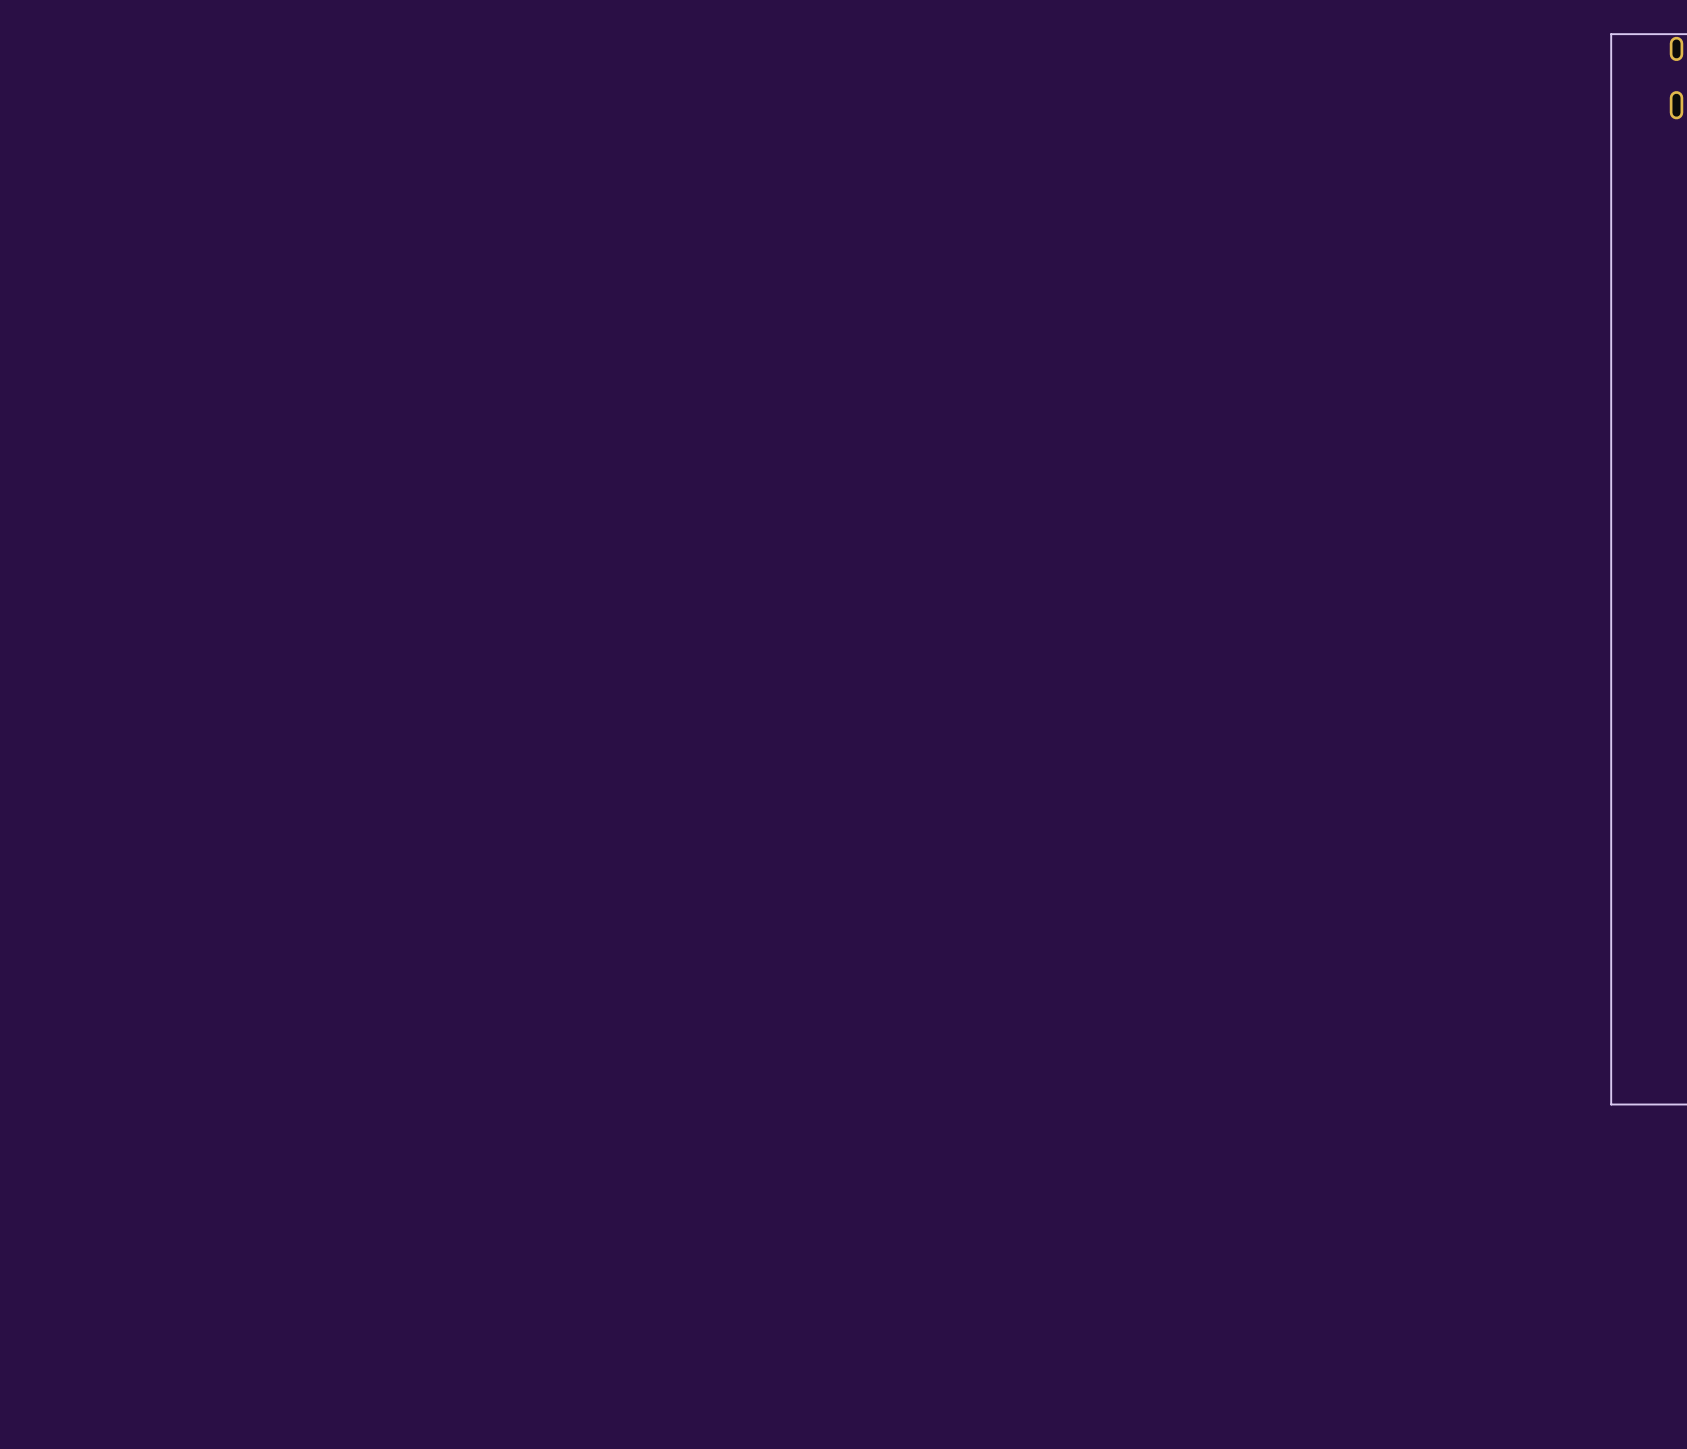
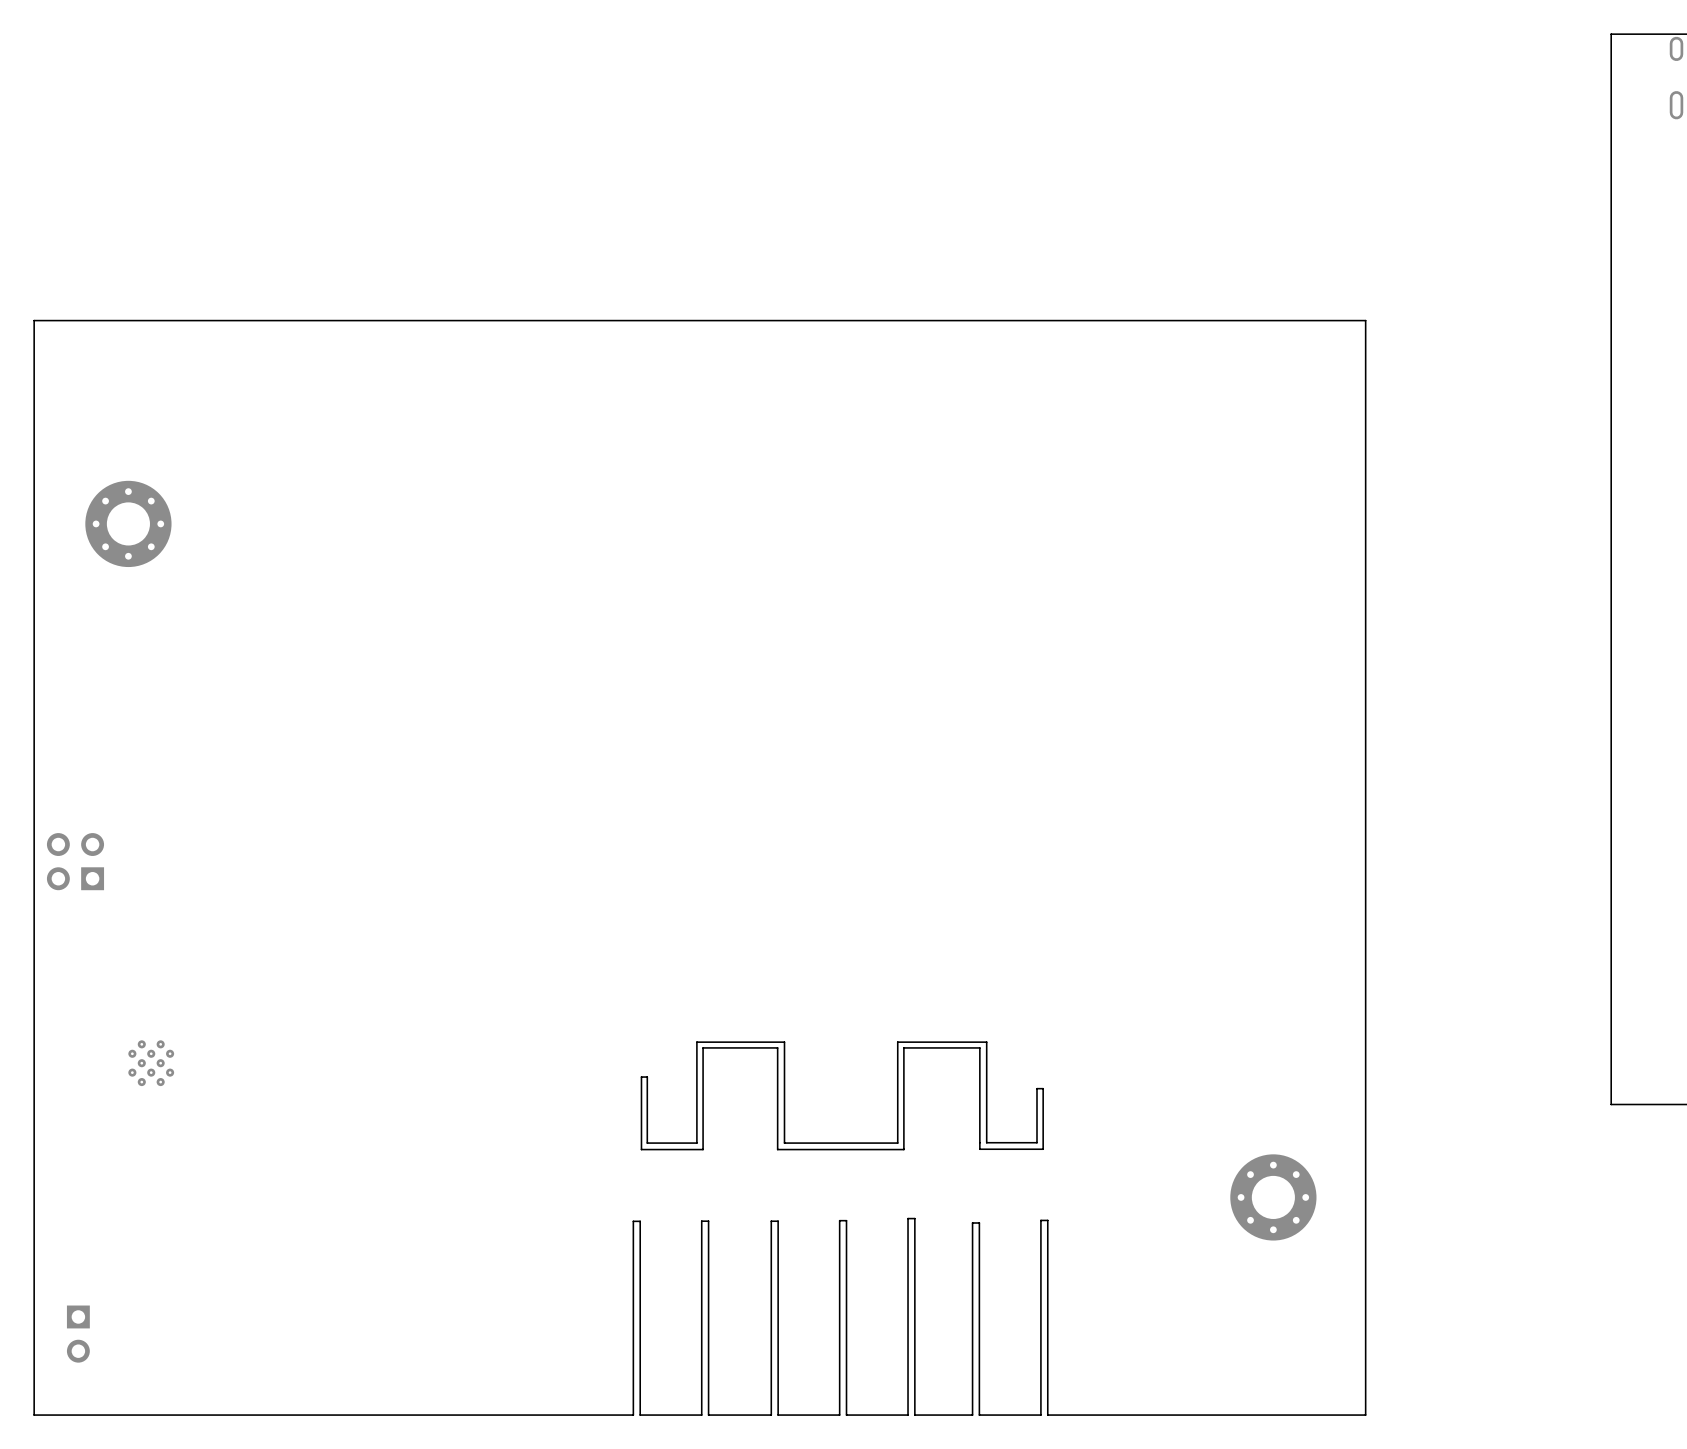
board edge: none -> (1365, 320) (1365, 1415) (1047, 1415) (1047, 1220) (1040, 1220) (1040, 1415) (979, 1415) (979, 1222) (972, 1222) (972, 1415) (914, 1415) (914, 1218) (908, 1218) (908, 1415) (846, 1415) (846, 1220) (839, 1220) (839, 1415) (778, 1415) (778, 1221) (771, 1221) (771, 1415) (708, 1415) (708, 1221) (701, 1221) (701, 1415) (640, 1415) (640, 1221) (633, 1221) (633, 1415) (34, 1415) (34, 320) (1365, 320)
part: none -> (128, 523)
part: none -> (75, 861)
board edge: none -> (986, 1042) (986, 1142) (1036, 1142) (1036, 1088) (1043, 1088) (1043, 1149) (979, 1149) (979, 1047) (903, 1047) (903, 1149) (777, 1149) (777, 1047) (703, 1047) (703, 1149) (641, 1149) (641, 1077) (647, 1077) (647, 1143) (696, 1143) (696, 1042) (784, 1042) (784, 1143) (897, 1143) (897, 1042) (986, 1042)
part: none -> (151, 1063)
part: none -> (1273, 1197)
part: none -> (78, 1334)

